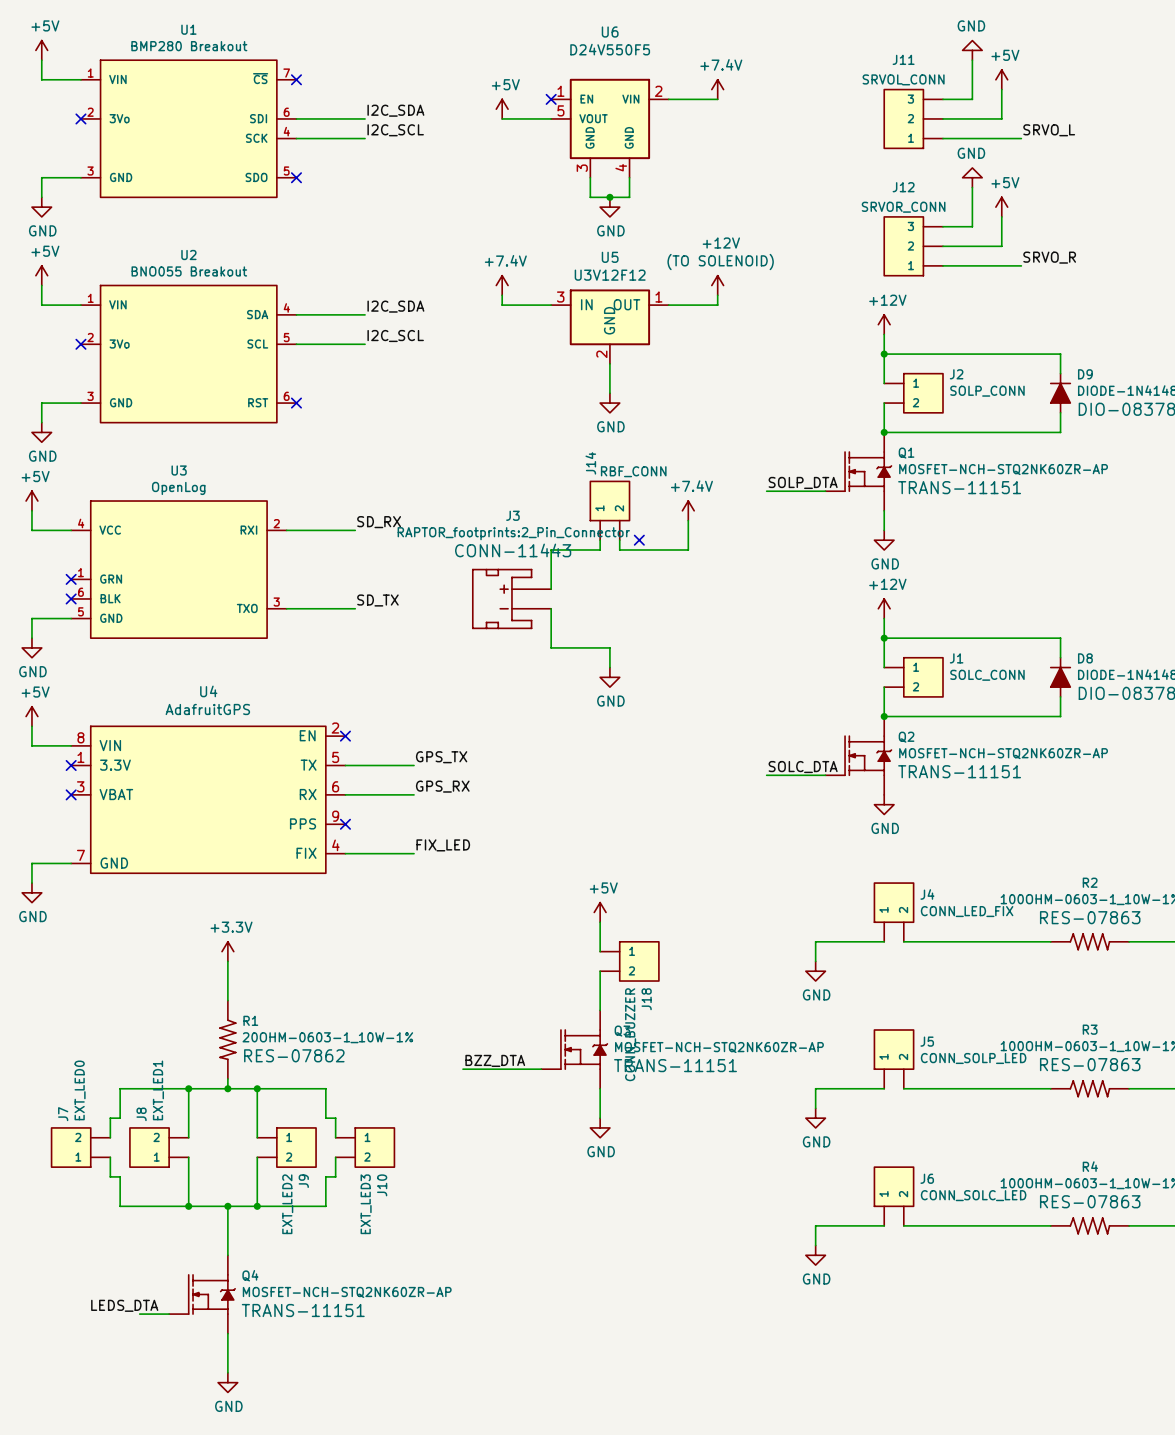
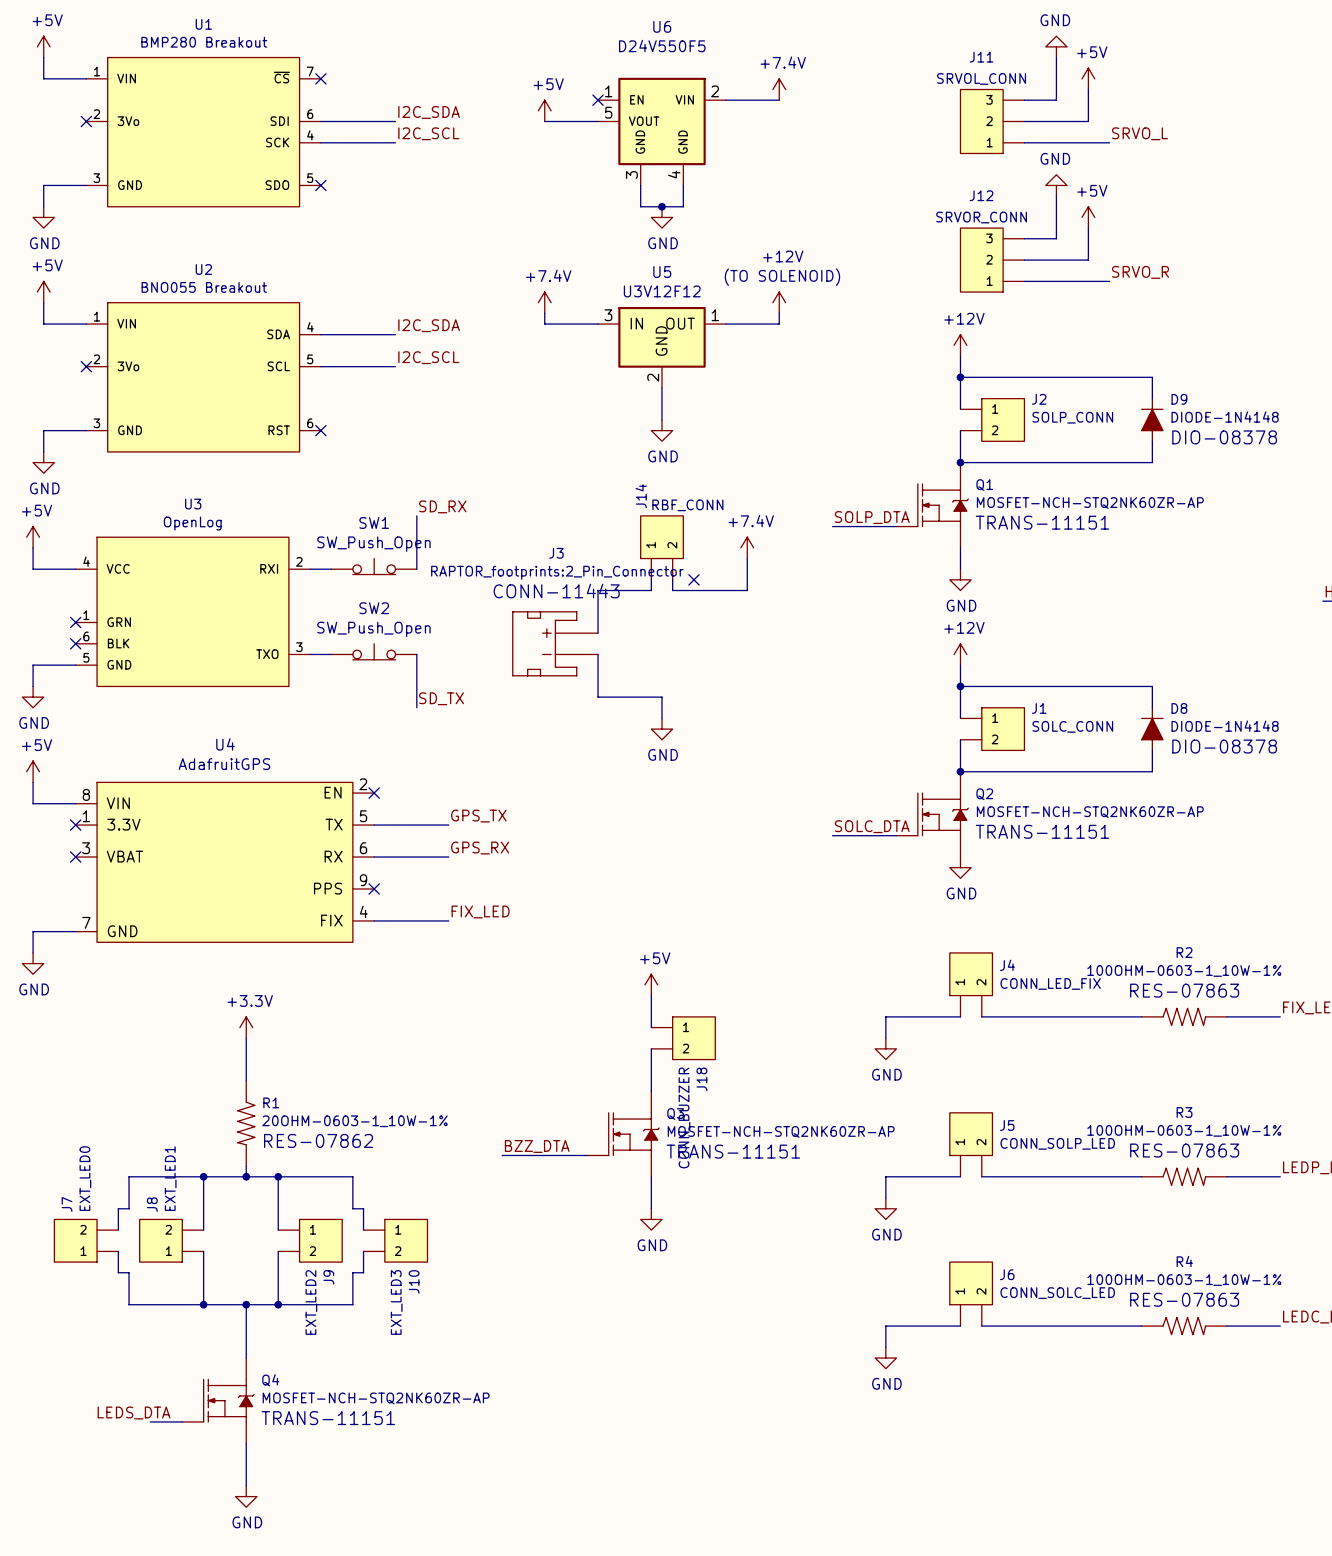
wire: none -> (416, 515) (416, 569)
label position: SD_RX (379, 522) -> SD_RX (442, 506)
SW1: none -> SW_Push_Open (374, 566)
wire: (306, 530) (355, 530) -> none
label position: SD_TX (377, 600) -> SD_TX (441, 698)
SW2: none -> SW_Push_Open (374, 651)
wire: (306, 608) (355, 608) -> none
wire: none -> (416, 654) (416, 707)

